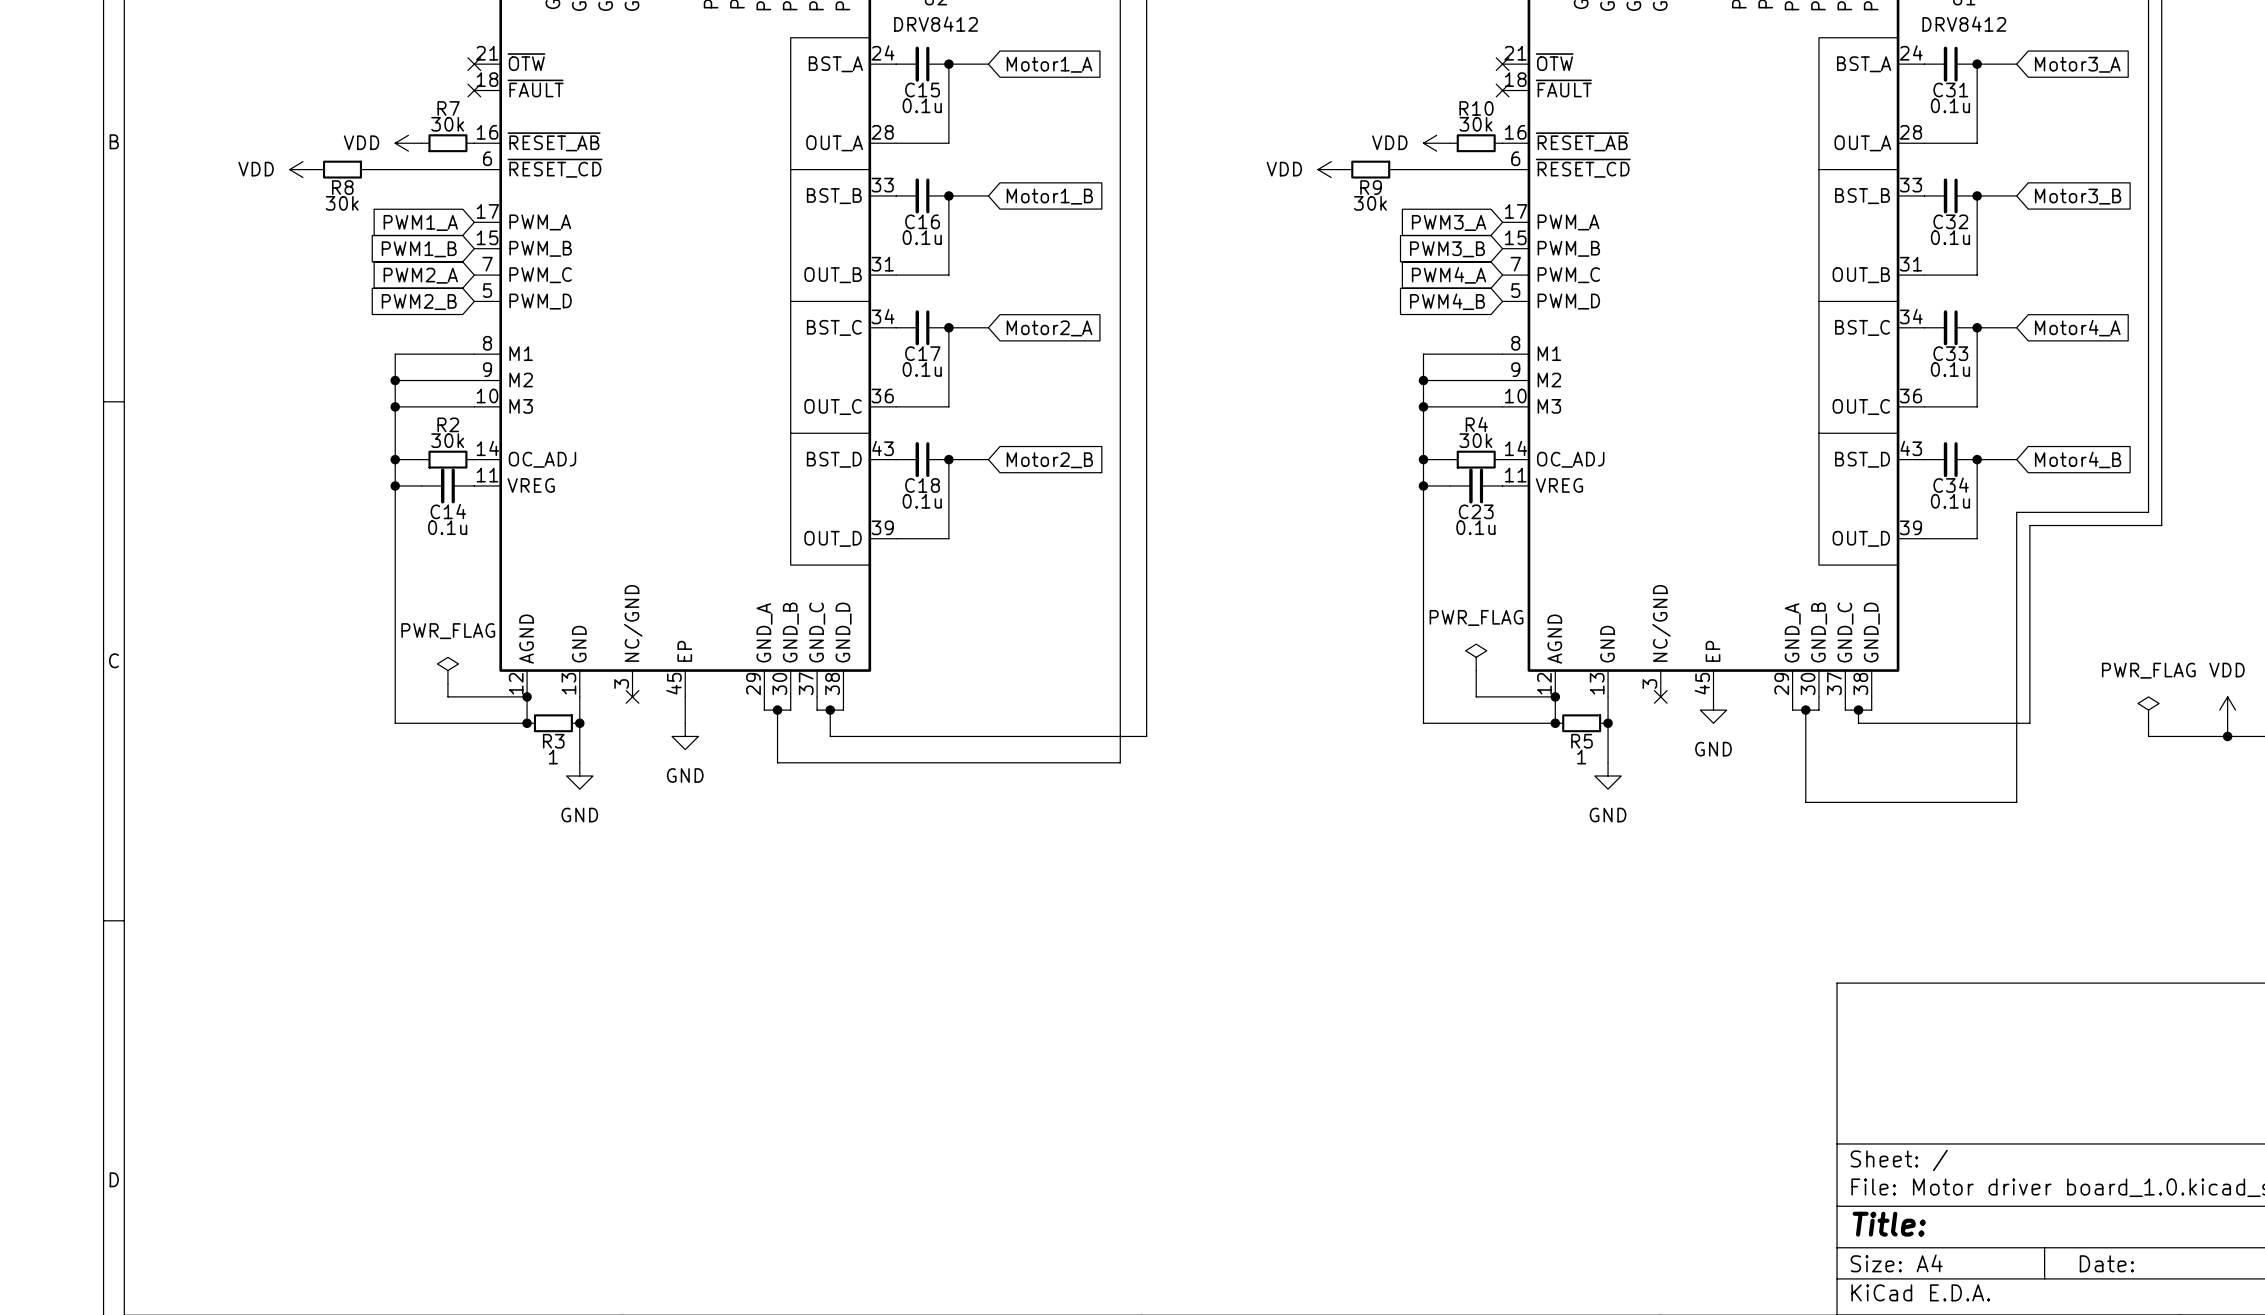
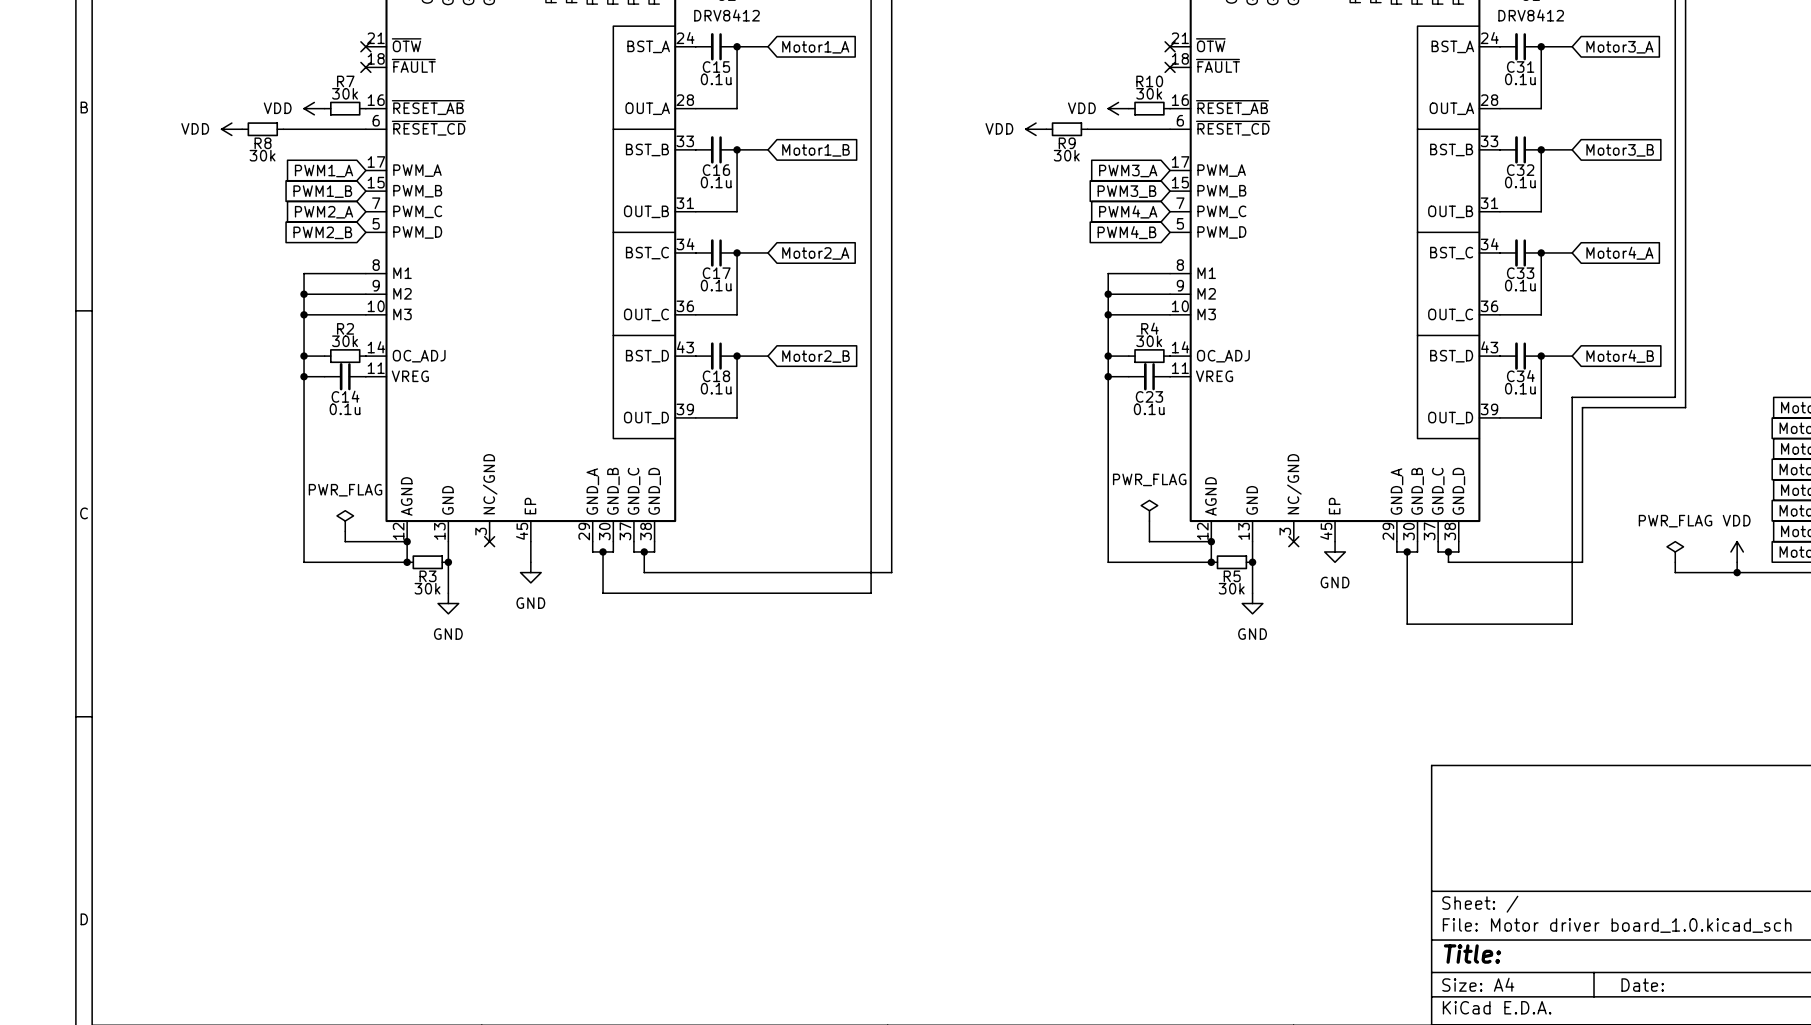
R3 value: 1 (553, 757) -> 30k (427, 588)
R5 value: 1 (1581, 757) -> 30k (1231, 588)

